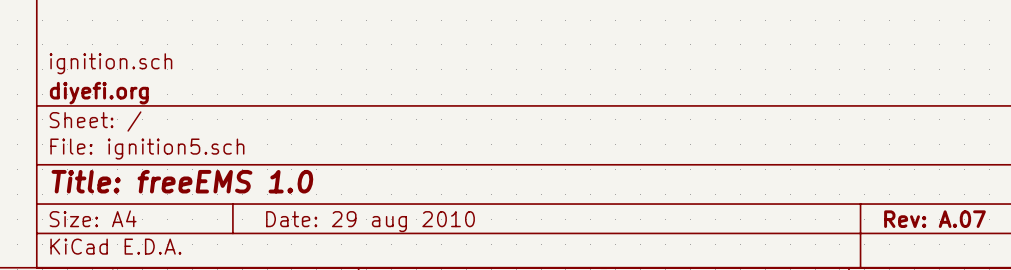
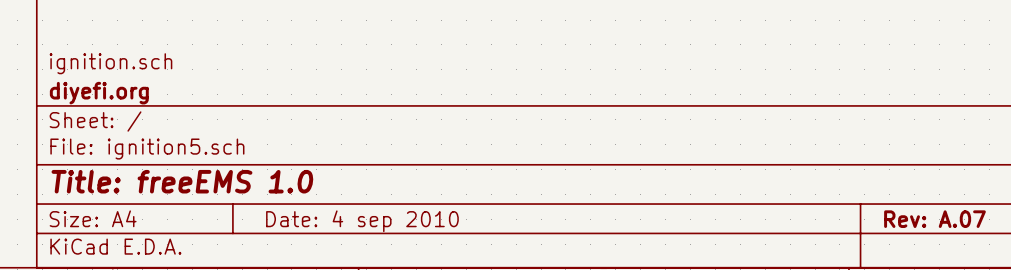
title block: Date: 29 aug 2010 (370, 221) -> Date: 4 sep 2010 (362, 221)

